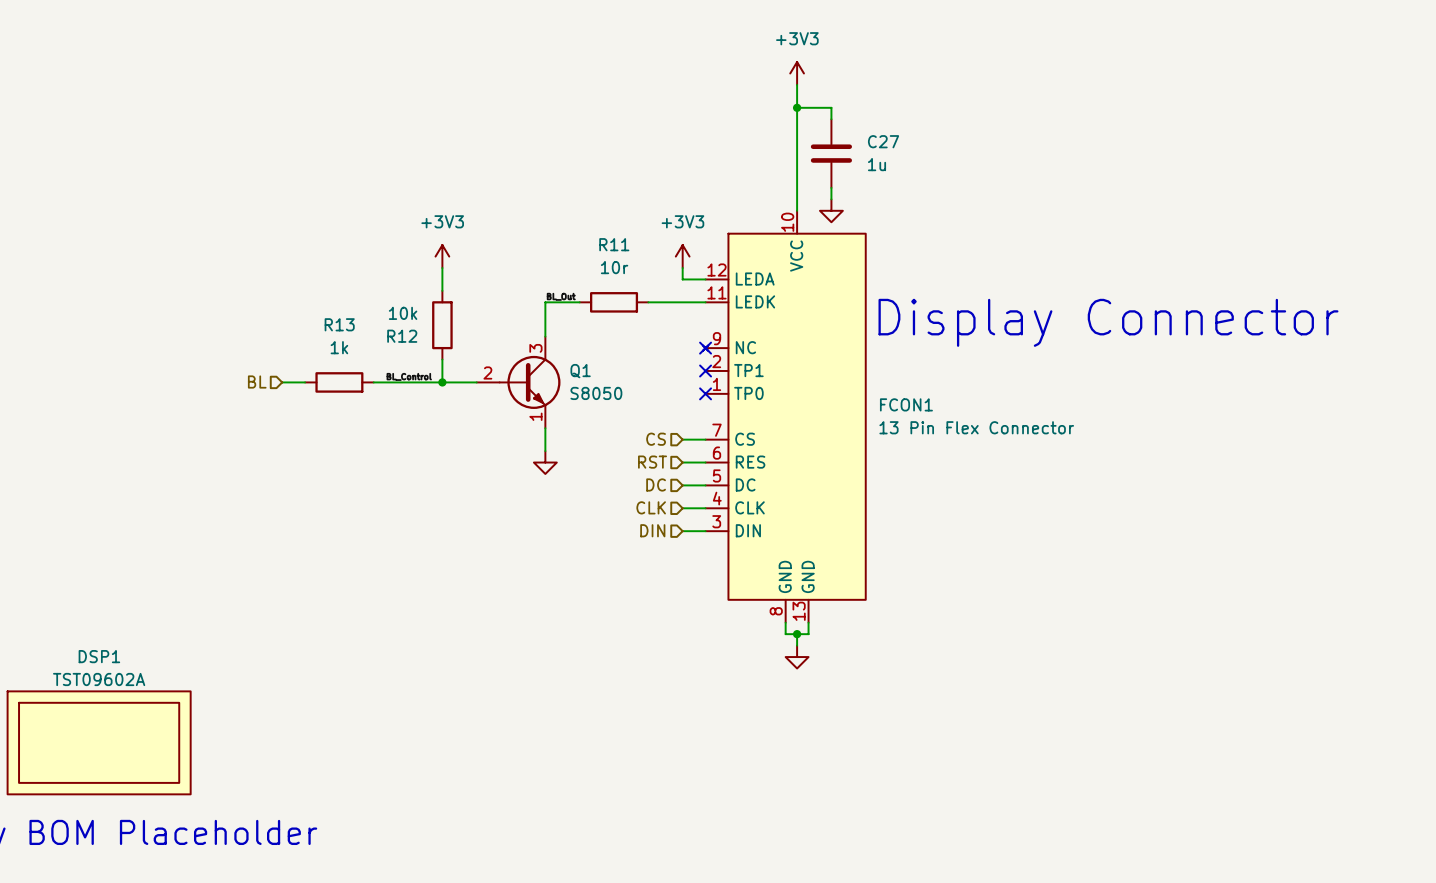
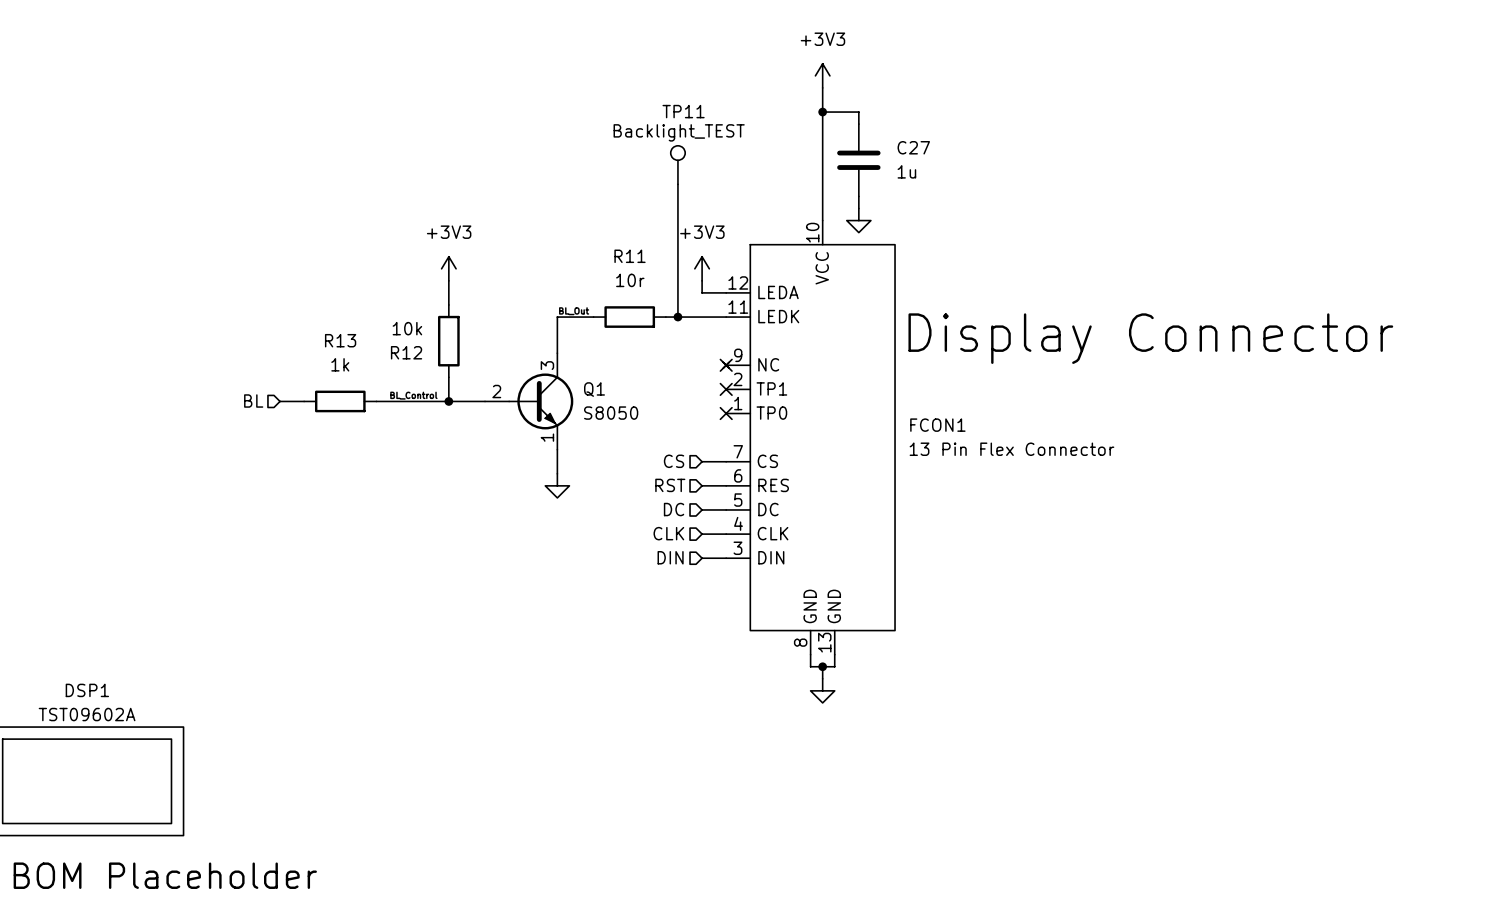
TP11: none -> Backlight_TEST (677, 165)
wire: none -> (677, 184) (677, 317)
junction: none -> (677, 317)

